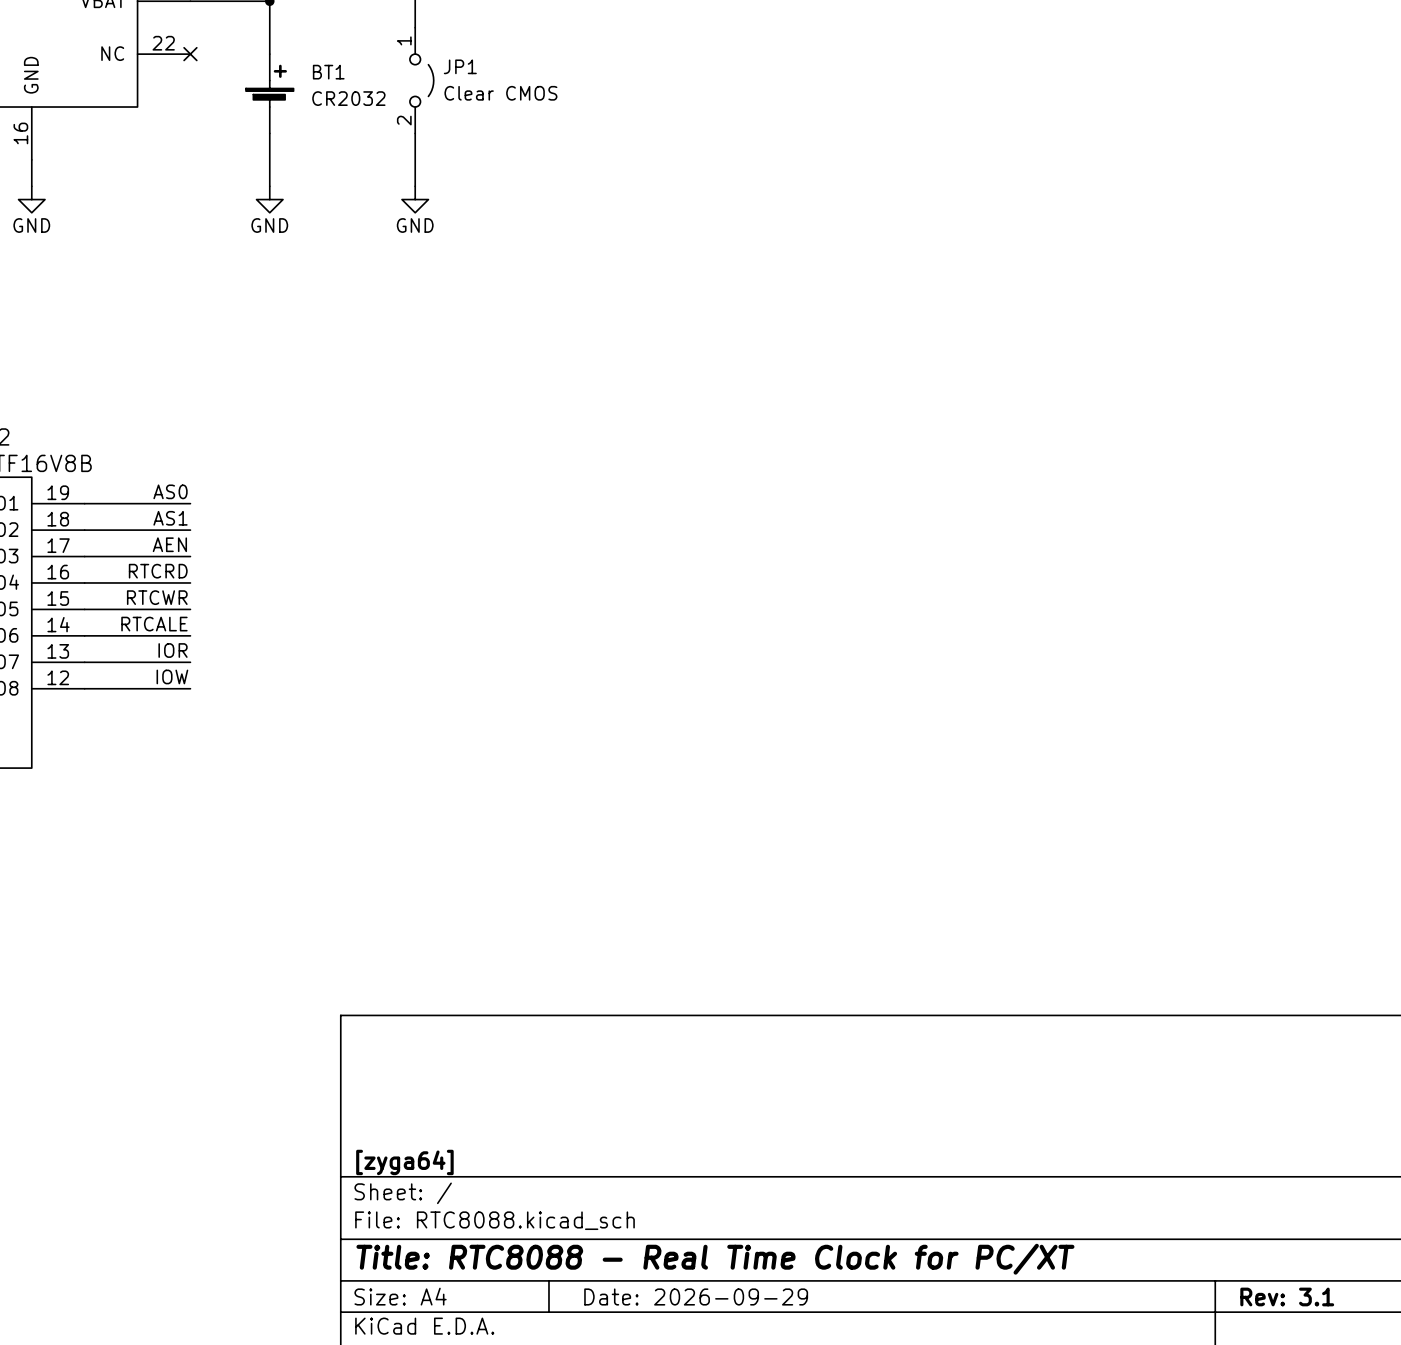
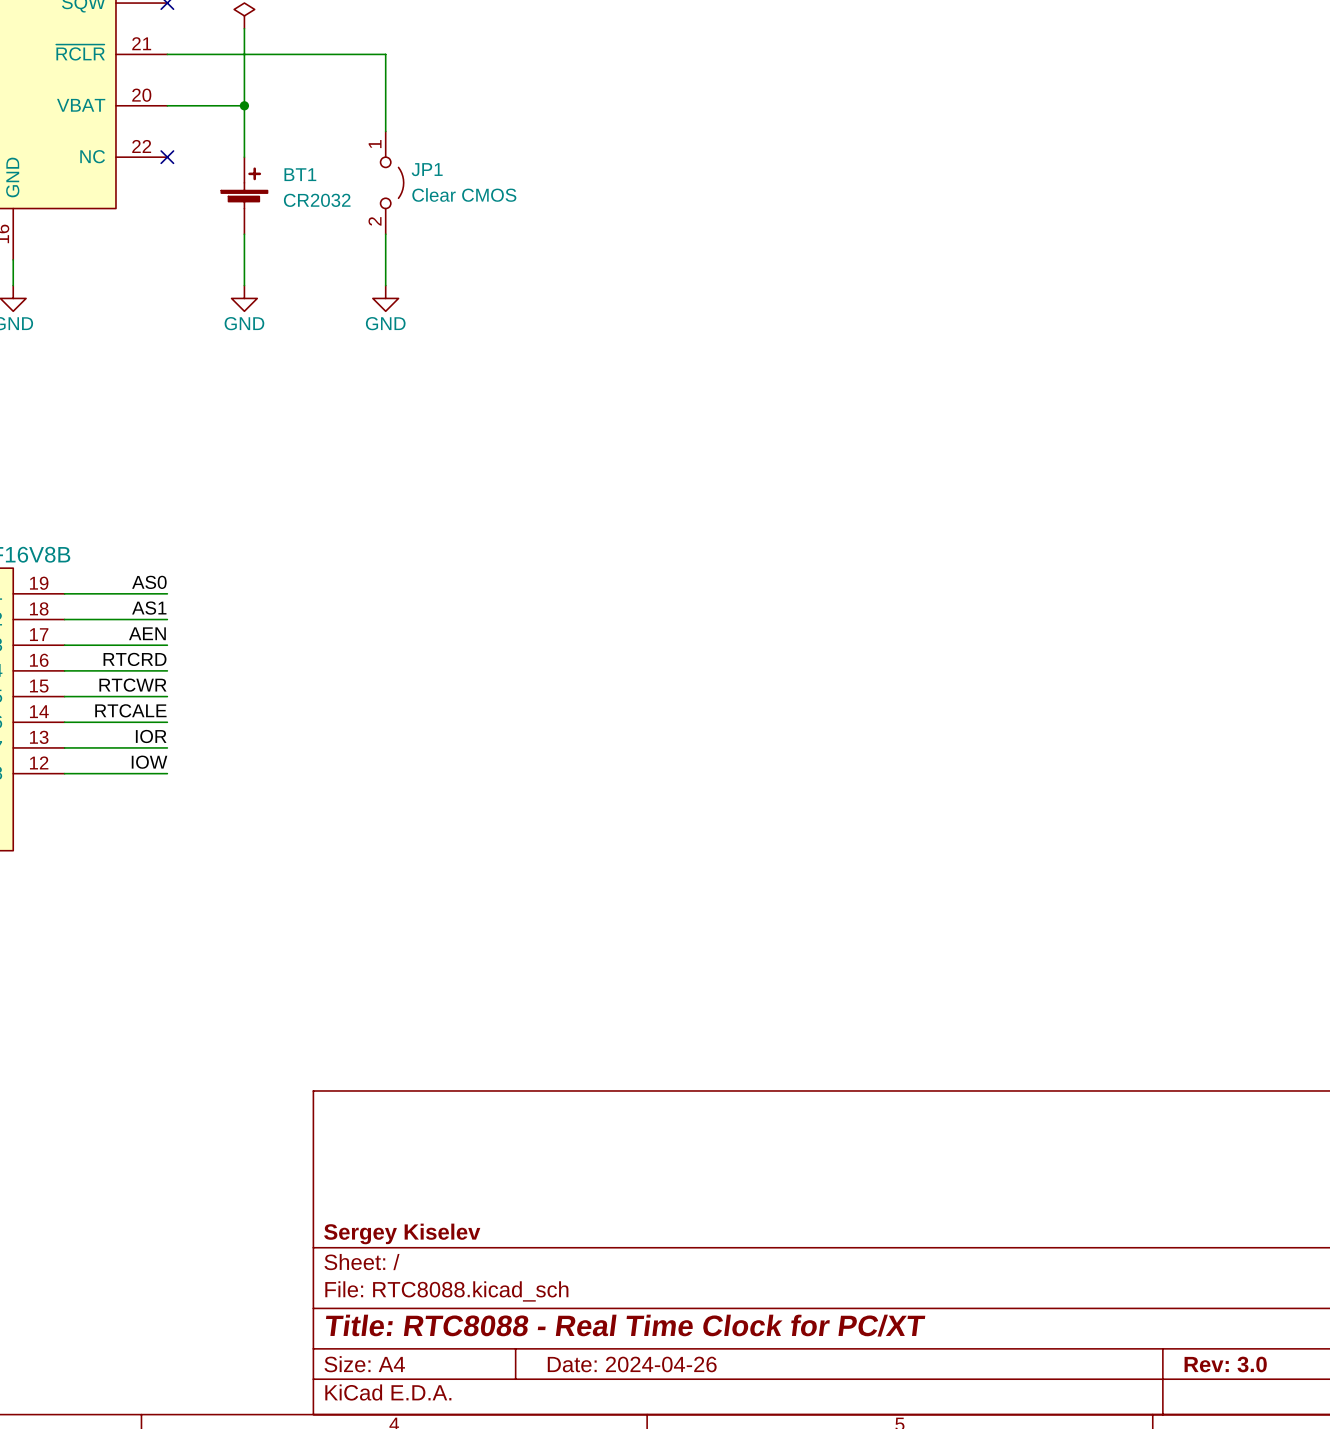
title block: [zyga64] (404, 1162) -> Sergey Kiselev (402, 1233)
title block: Date: 2026-09-29 (696, 1296) -> Date: 2024-04-26 (632, 1364)
title block: Rev: 3.1 (1287, 1296) -> Rev: 3.0 (1225, 1364)

